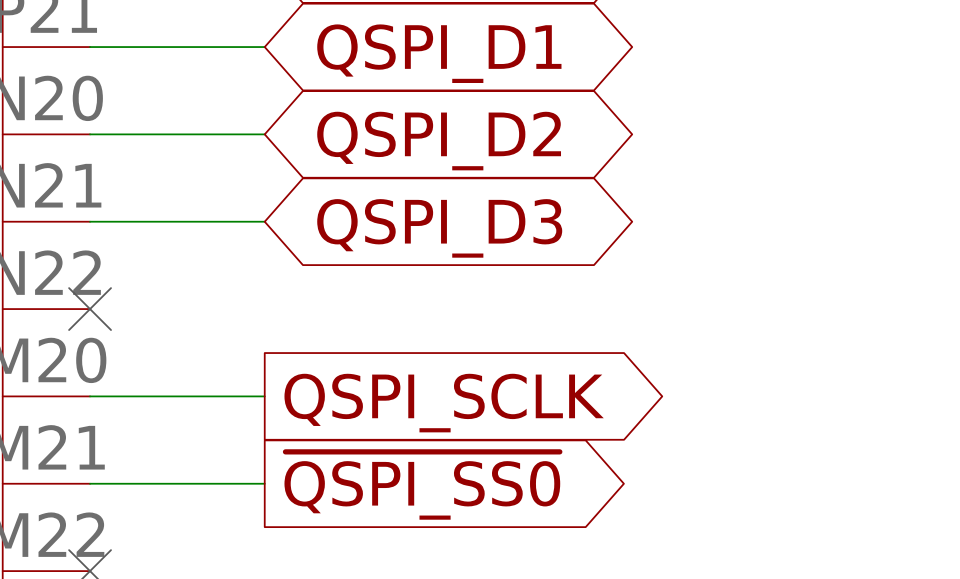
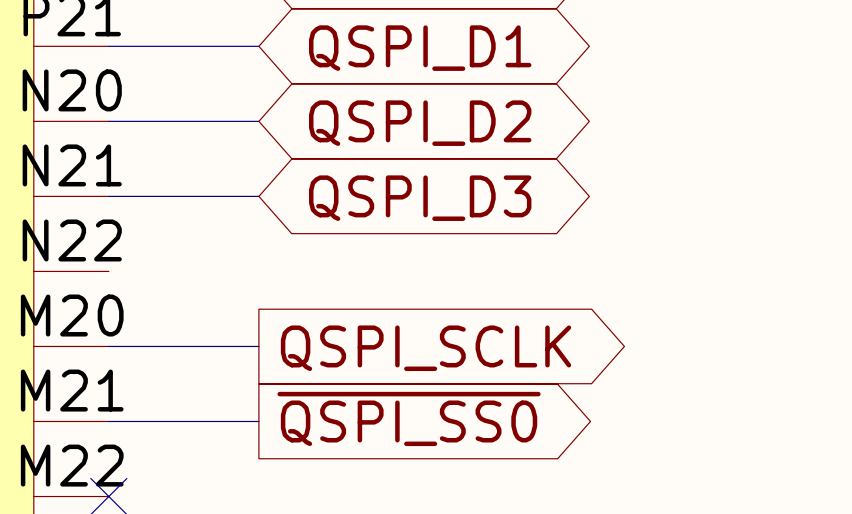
no-connect mark: (90, 309) -> none

